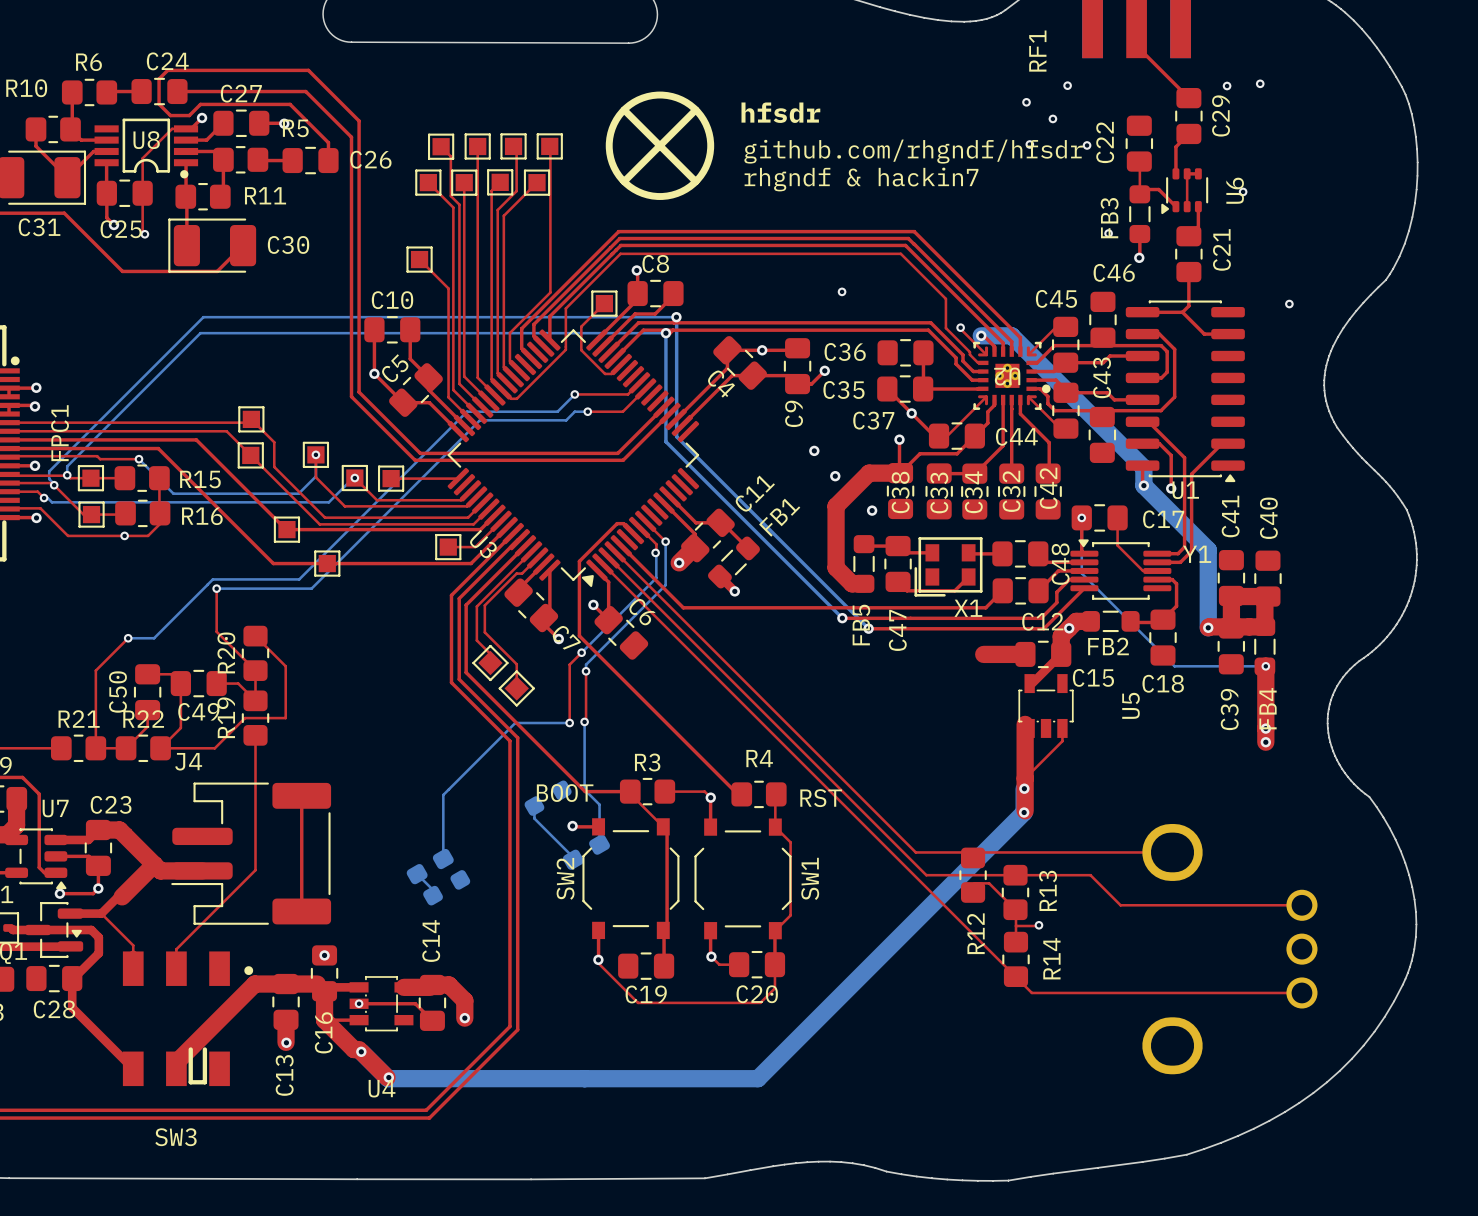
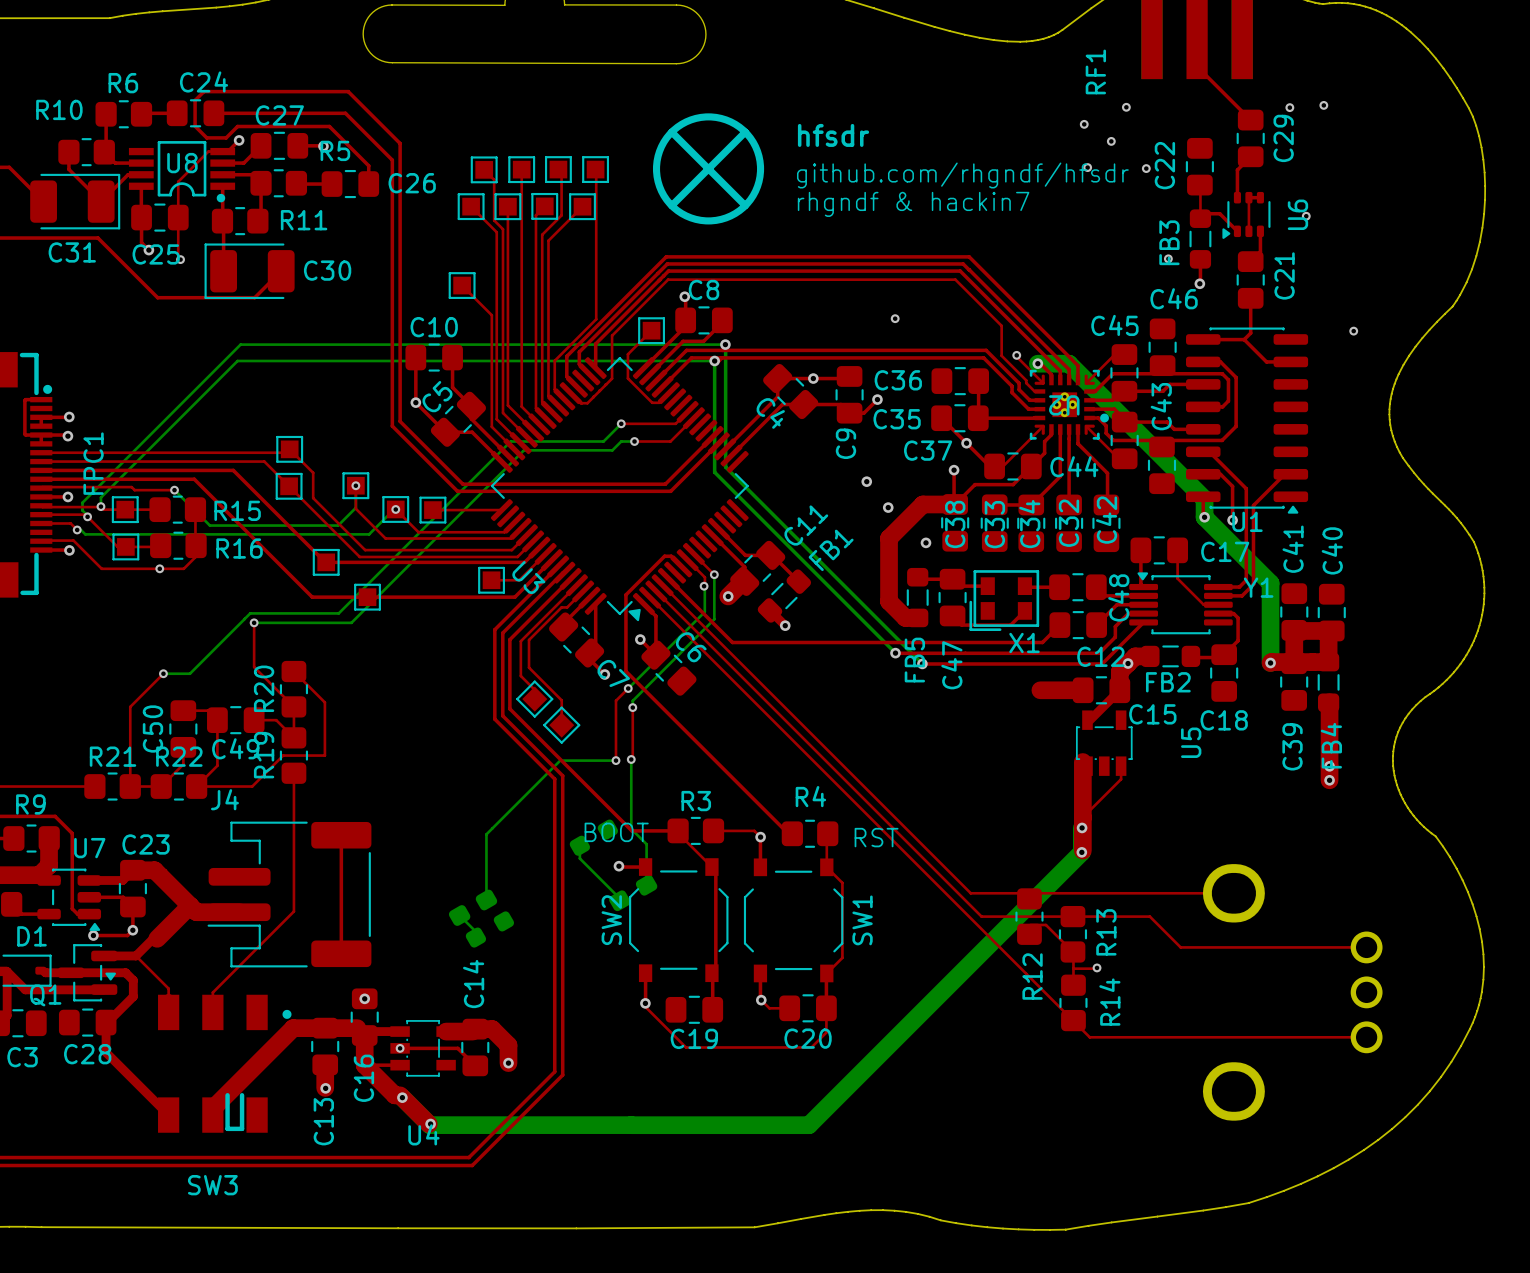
top track: (565, 349) (516, 398) (510, 398) (501, 388) -> (612, 378) (587, 403) (580, 403) (570, 393)
bottom track: (1081, 517) (1081, 573) (1174, 666) (1265, 666) -> none
via: (1081, 517) -> none
via: (1265, 666) -> none

